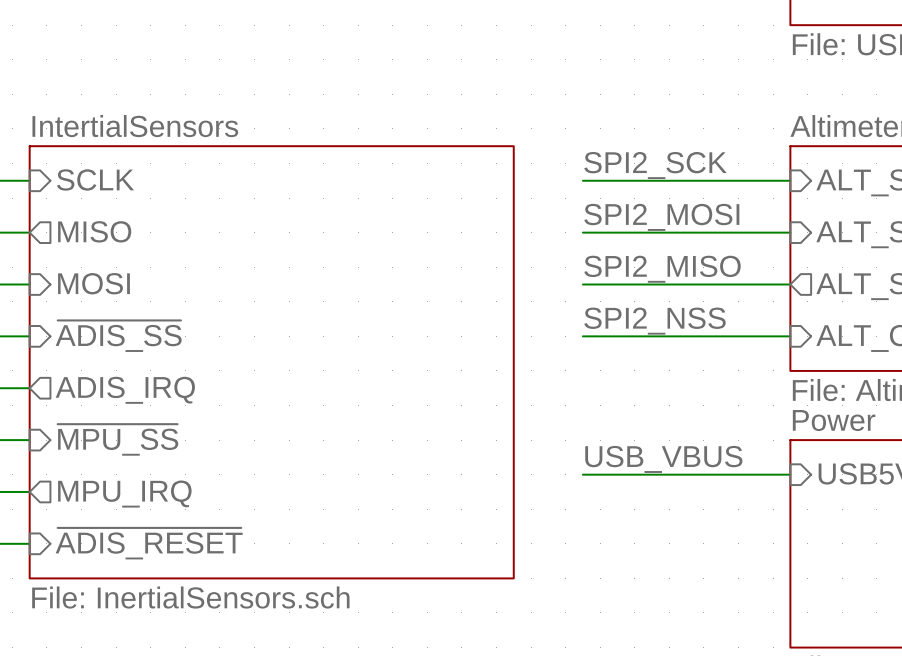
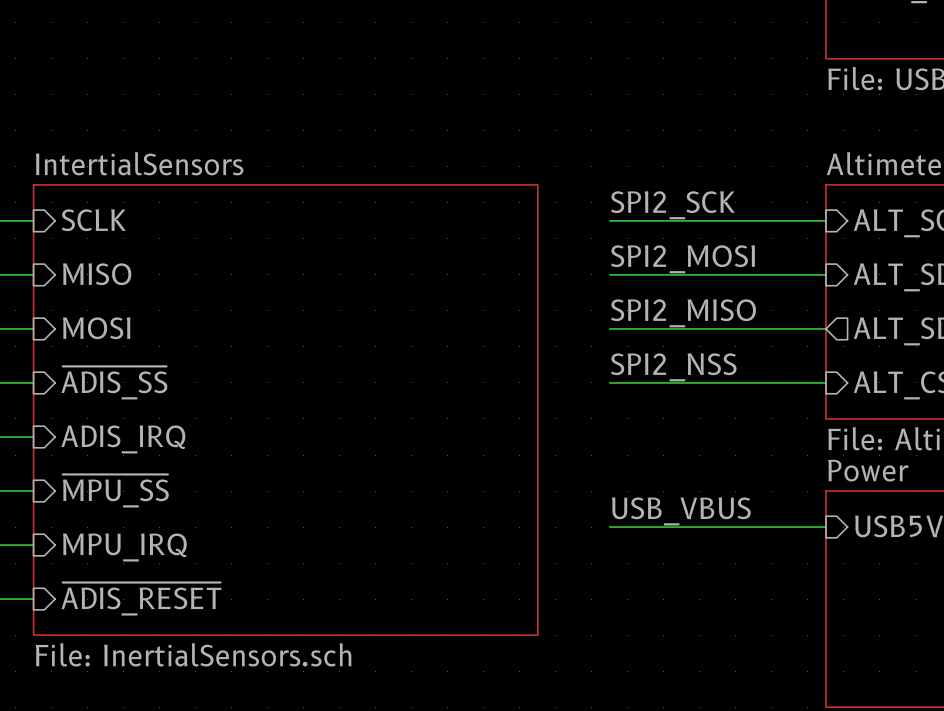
sheet pin shape: output (94, 231) -> input (97, 274)
sheet pin shape: output (125, 390) -> input (123, 439)
sheet pin shape: output (124, 494) -> input (124, 547)

